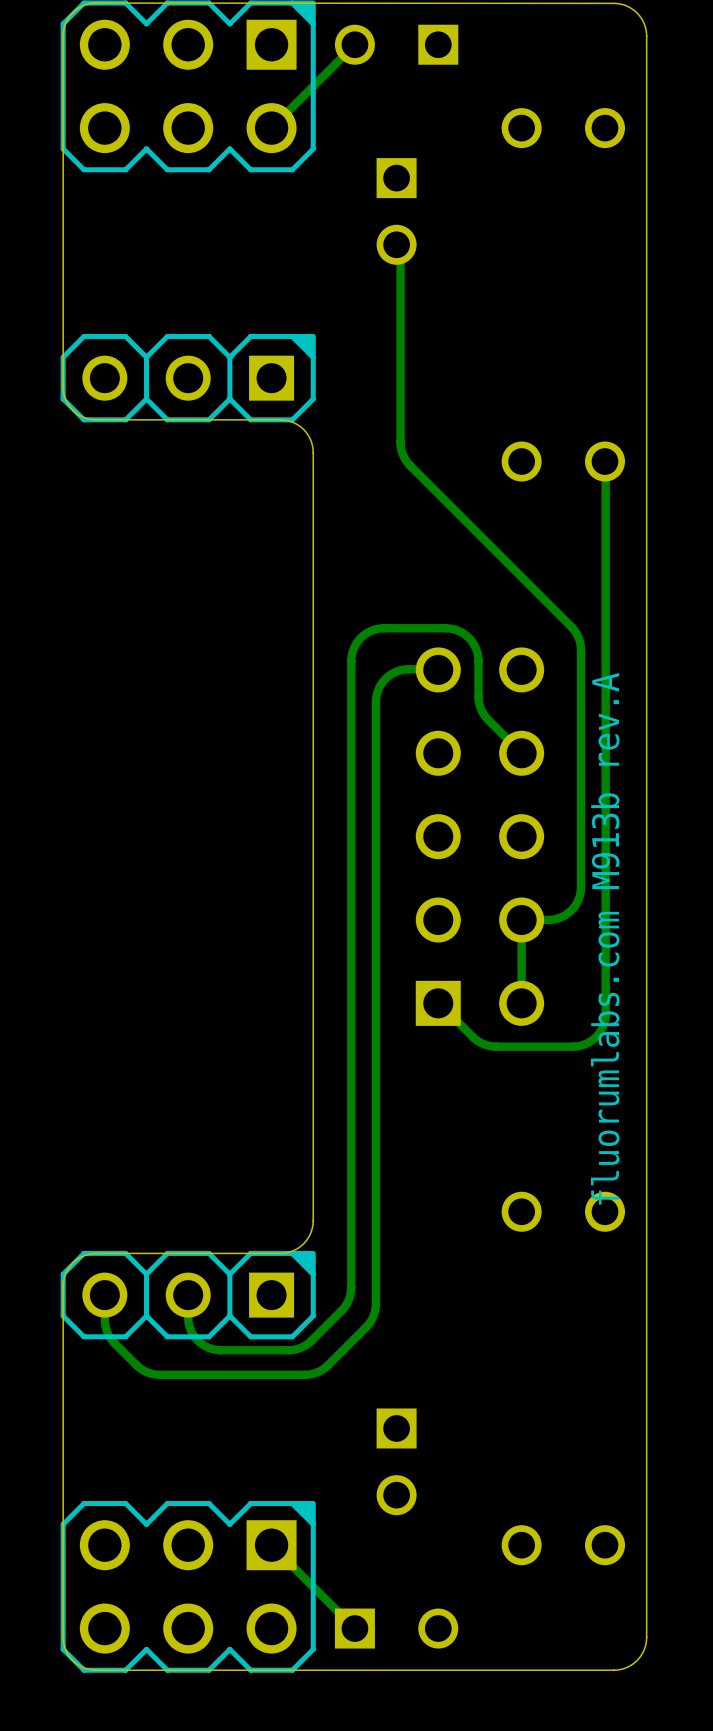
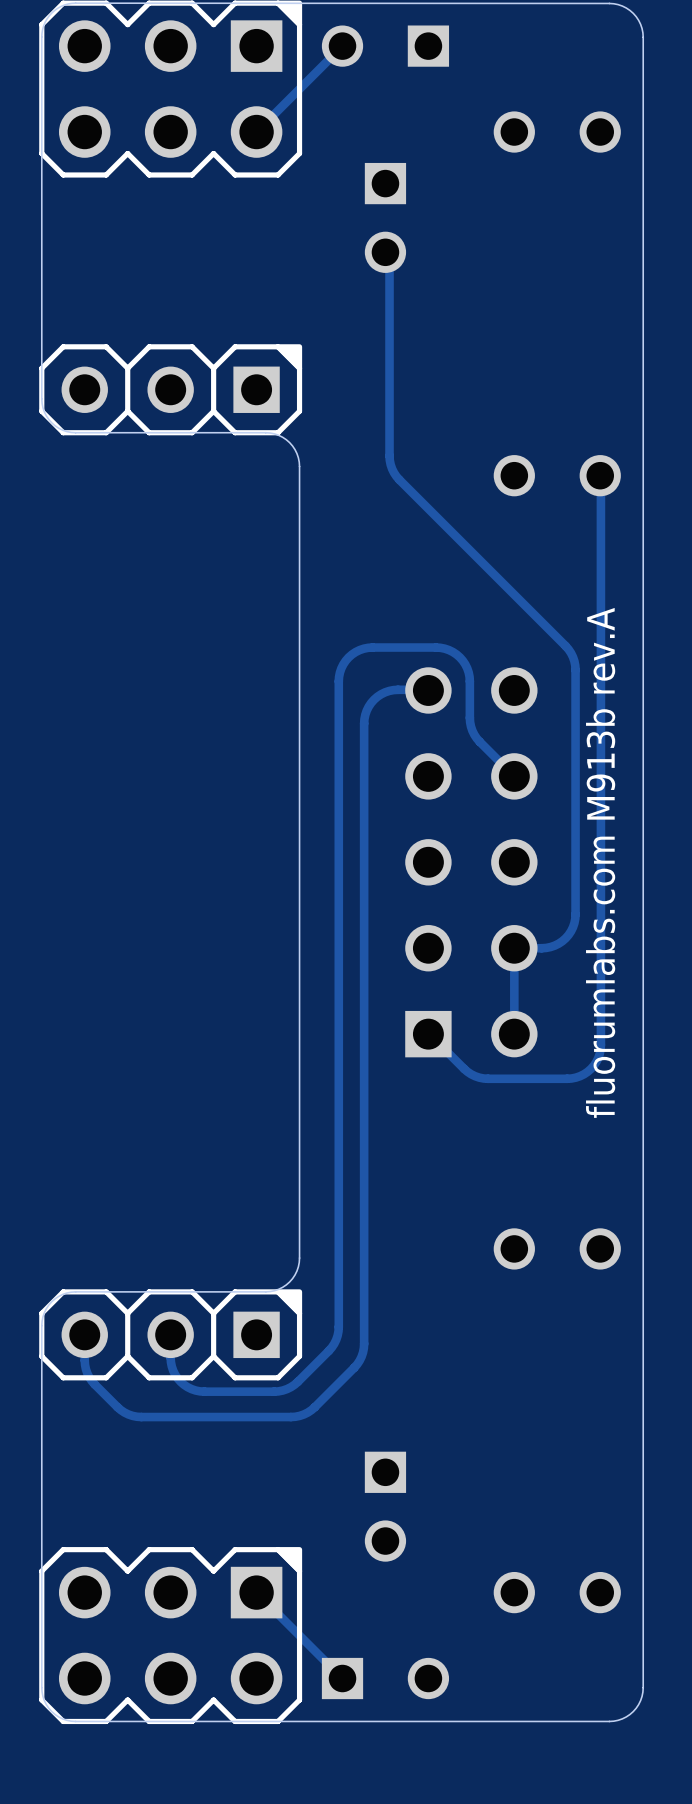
text position: fluorumlabs.com M913b rev.A (605, 938) -> fluorumlabs.com M913b rev.A (600, 862)

